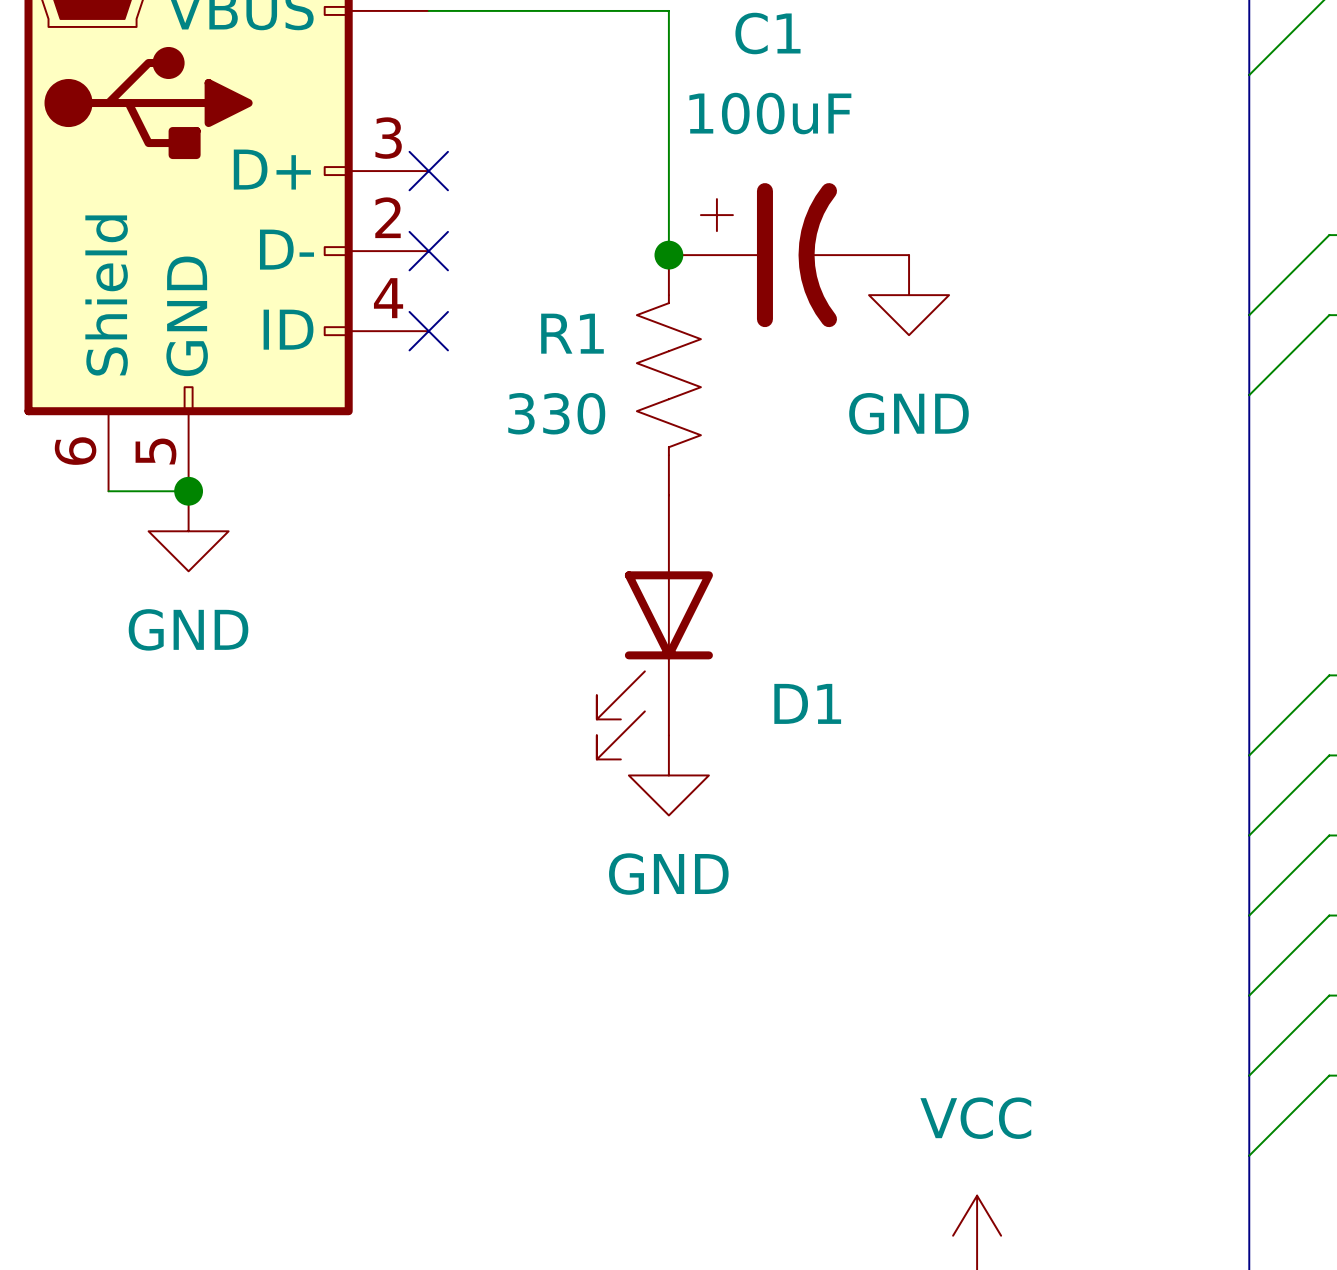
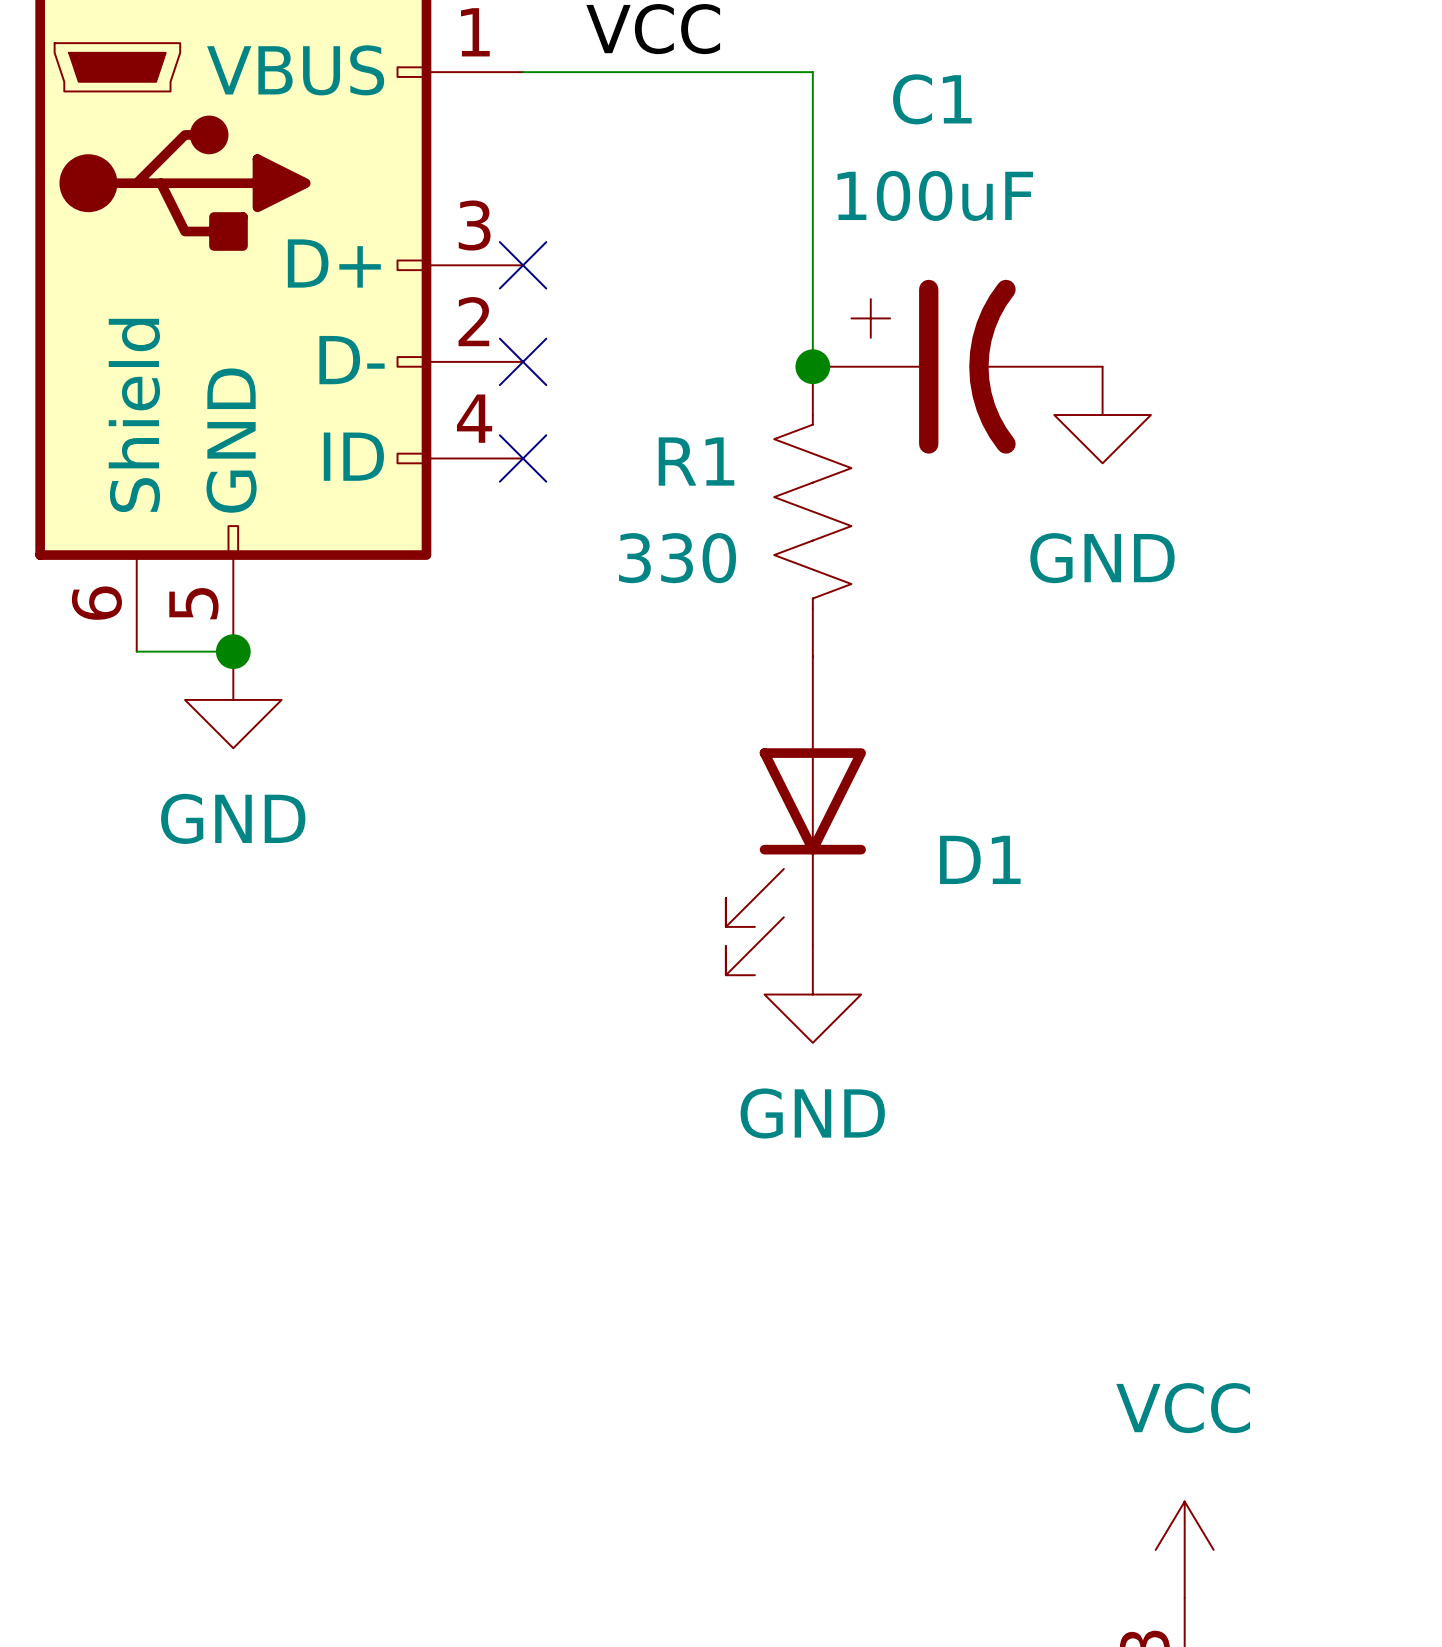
D1 name position: D1 (807, 703) -> D1 (980, 859)

